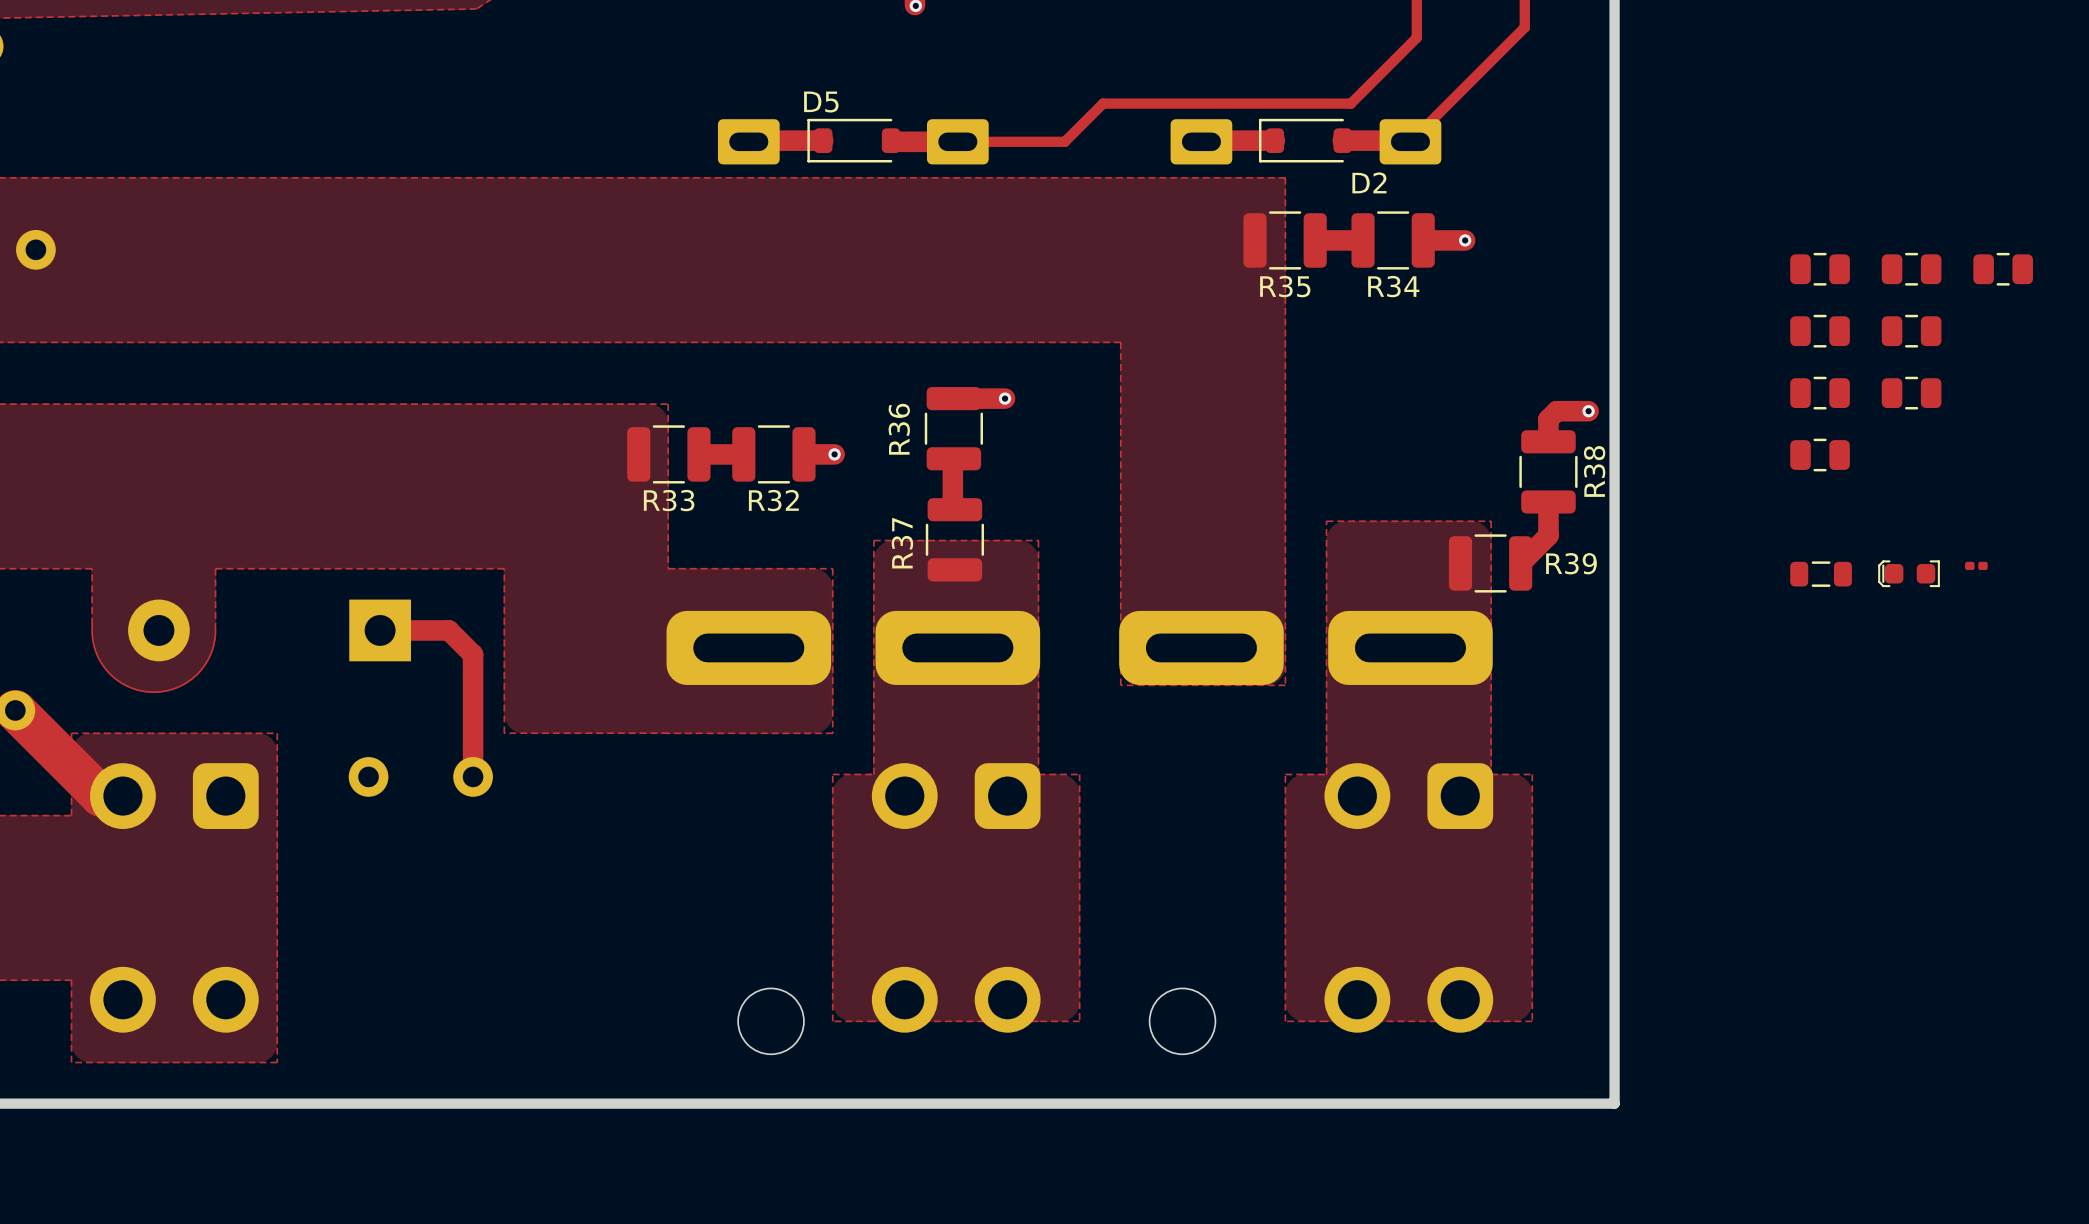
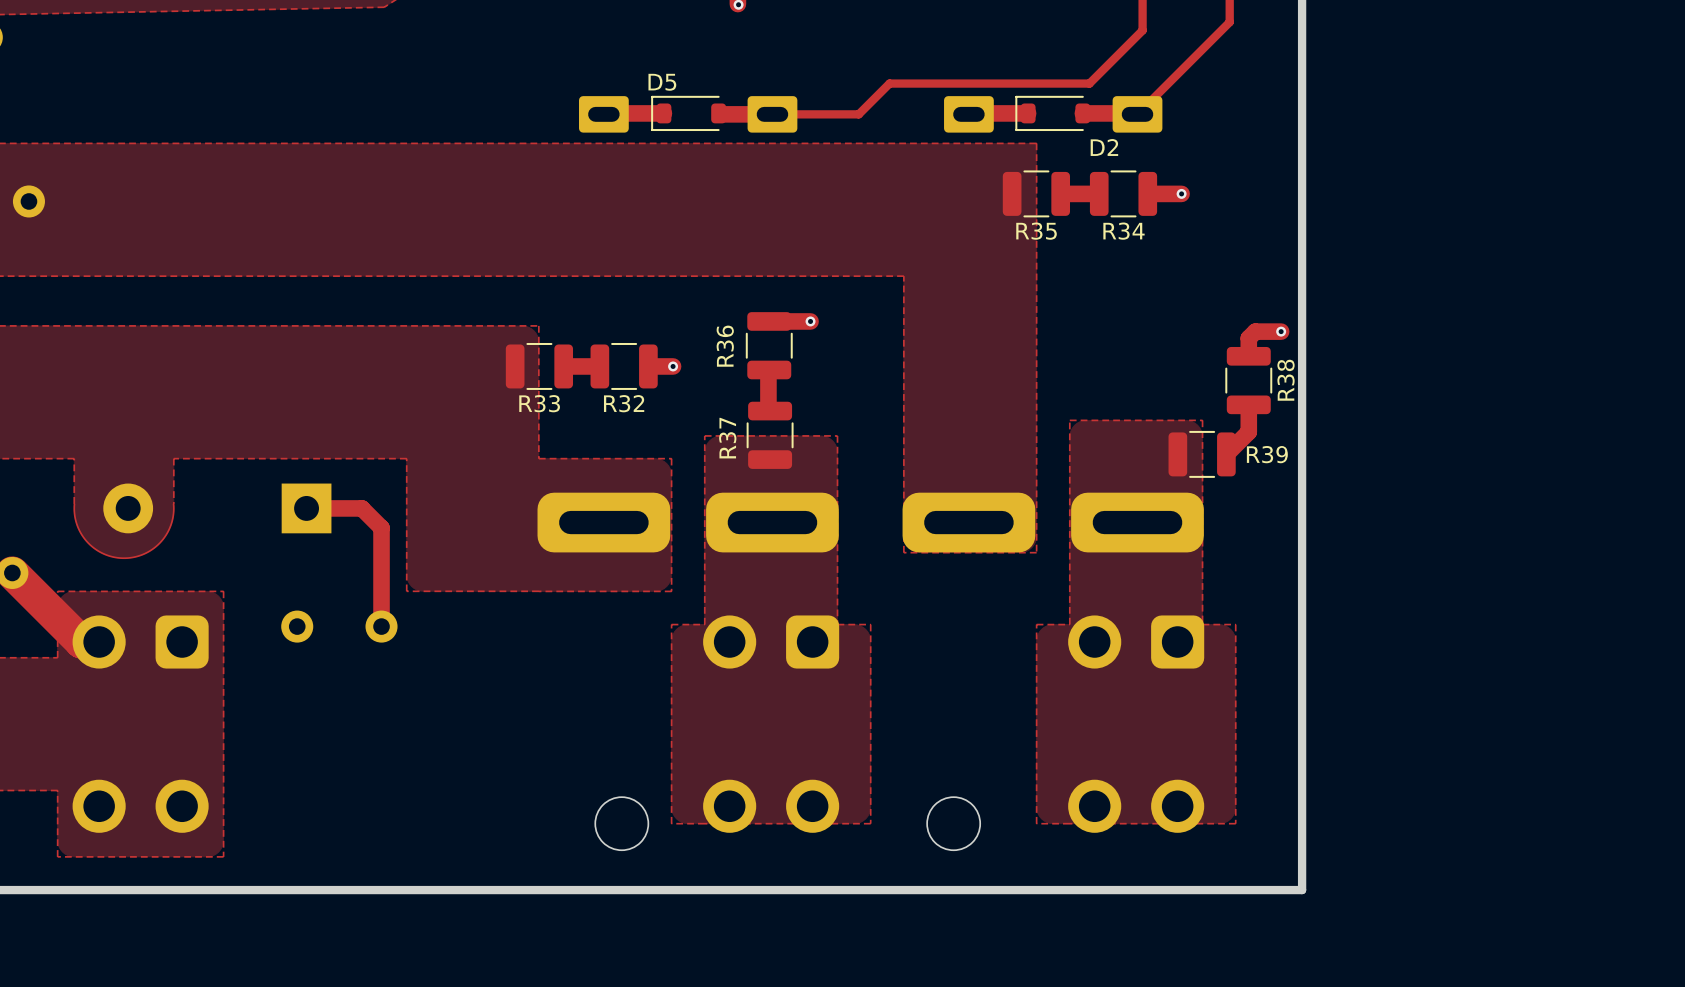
part: (1820, 269) -> none
part: (1911, 269) -> none
part: (2003, 269) -> none
part: (1820, 331) -> none
part: (1911, 331) -> none
part: (1820, 393) -> none
part: (1911, 393) -> none
part: (1820, 455) -> none
part: (1976, 565) -> none
part: (1909, 573) -> none
part: (1821, 574) -> none

